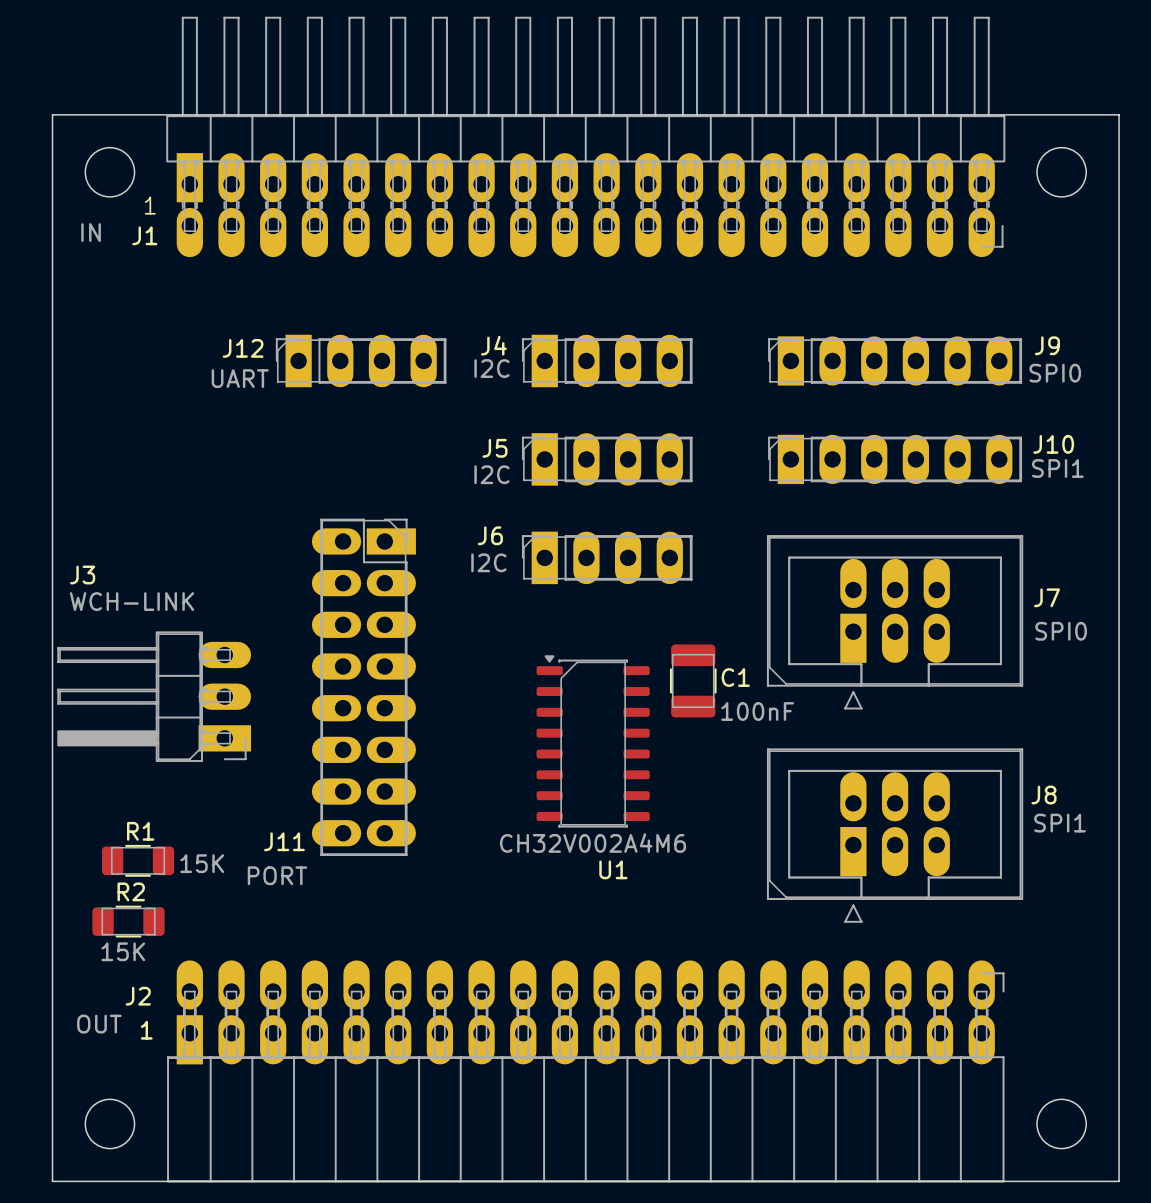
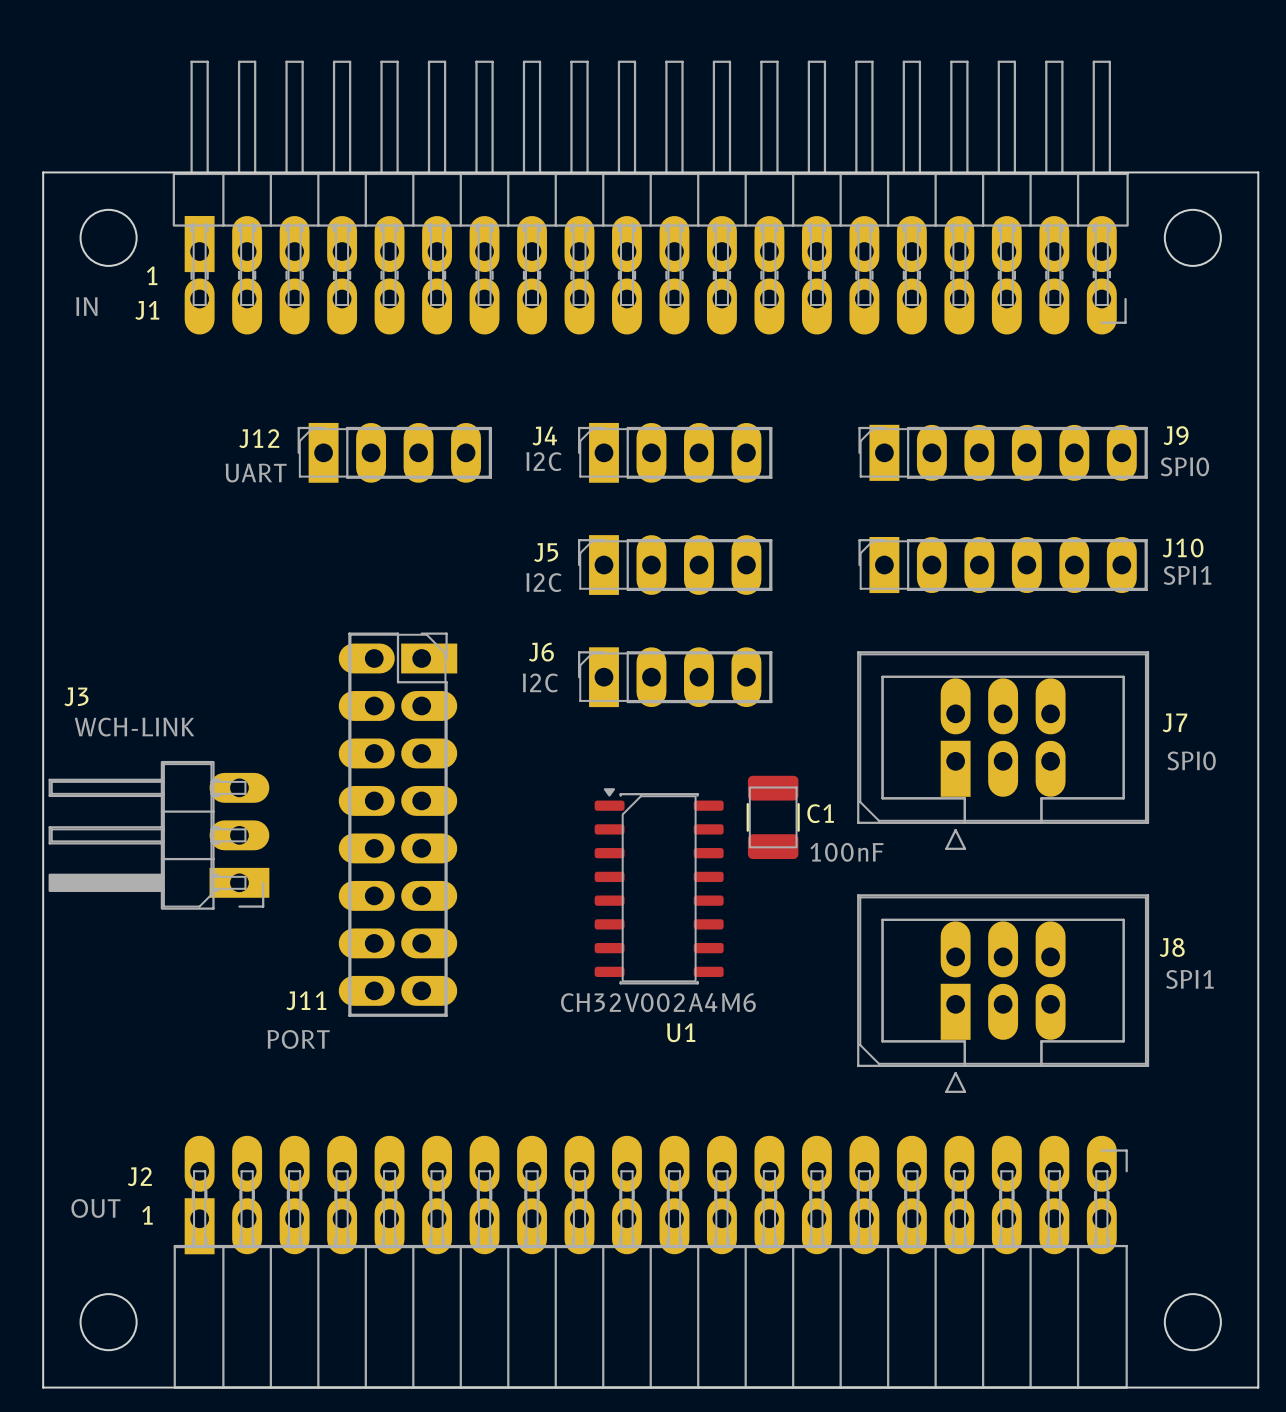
R1: 15K (138, 860) -> none
R2: 15K (128, 921) -> none

